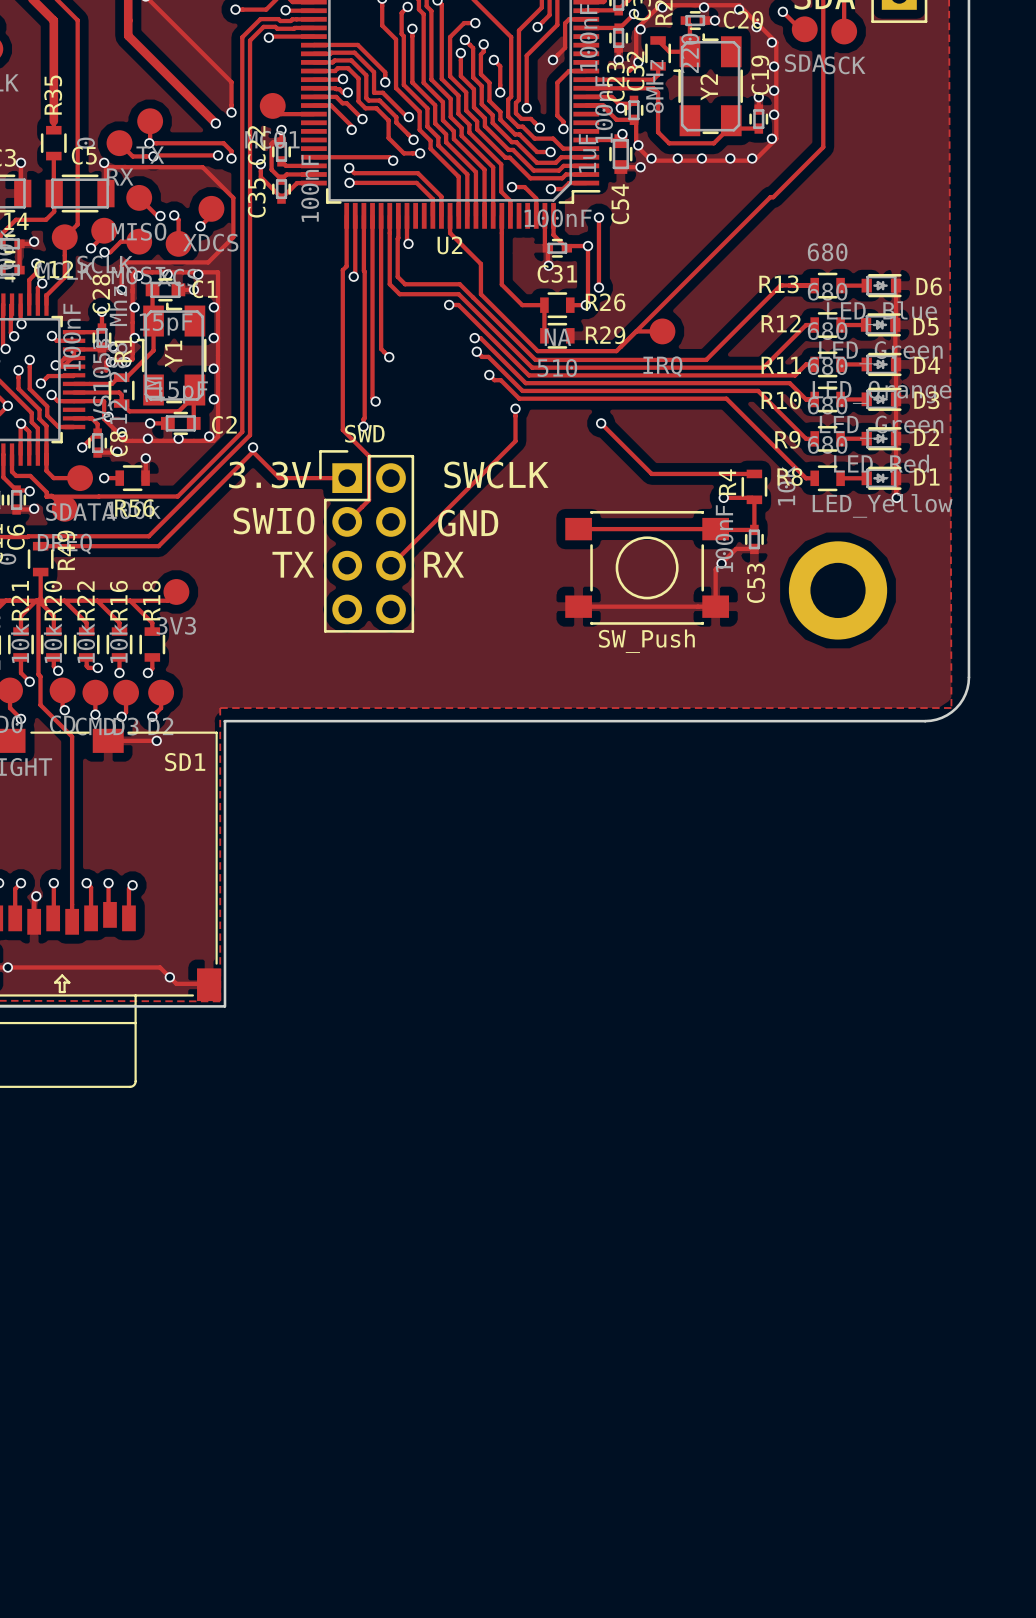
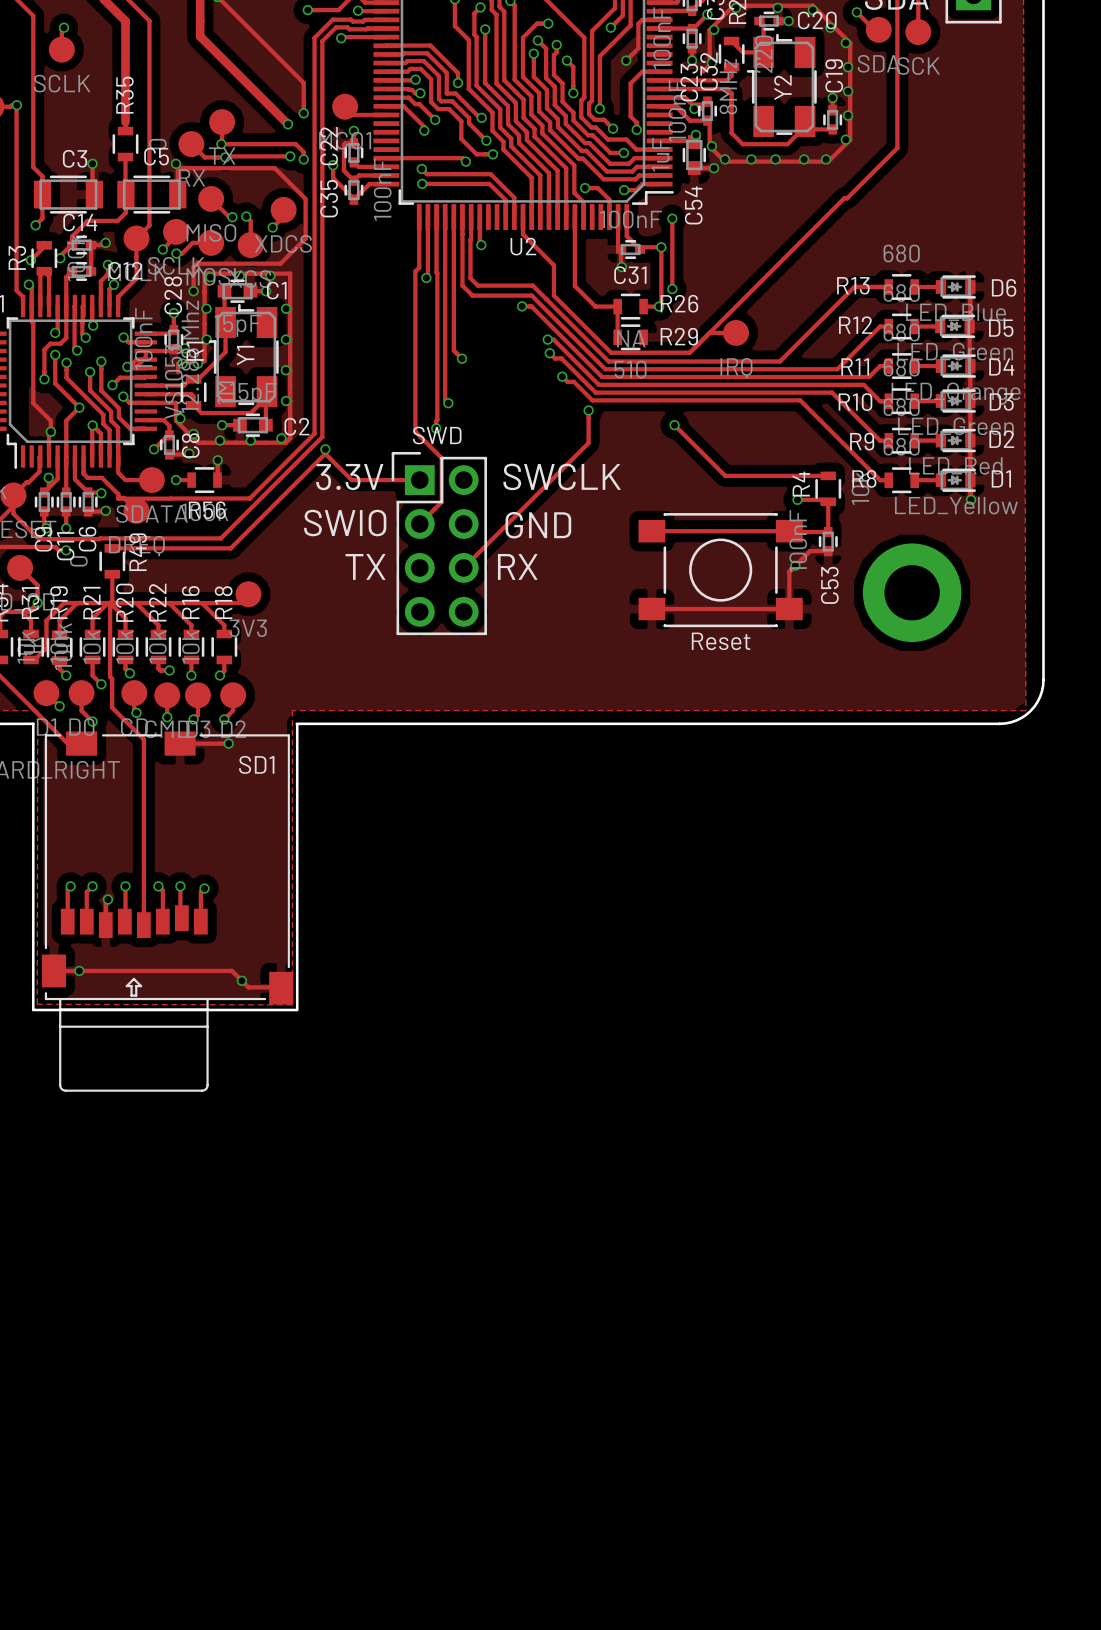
part value: SW_Push (646, 641) -> Reset (721, 641)

